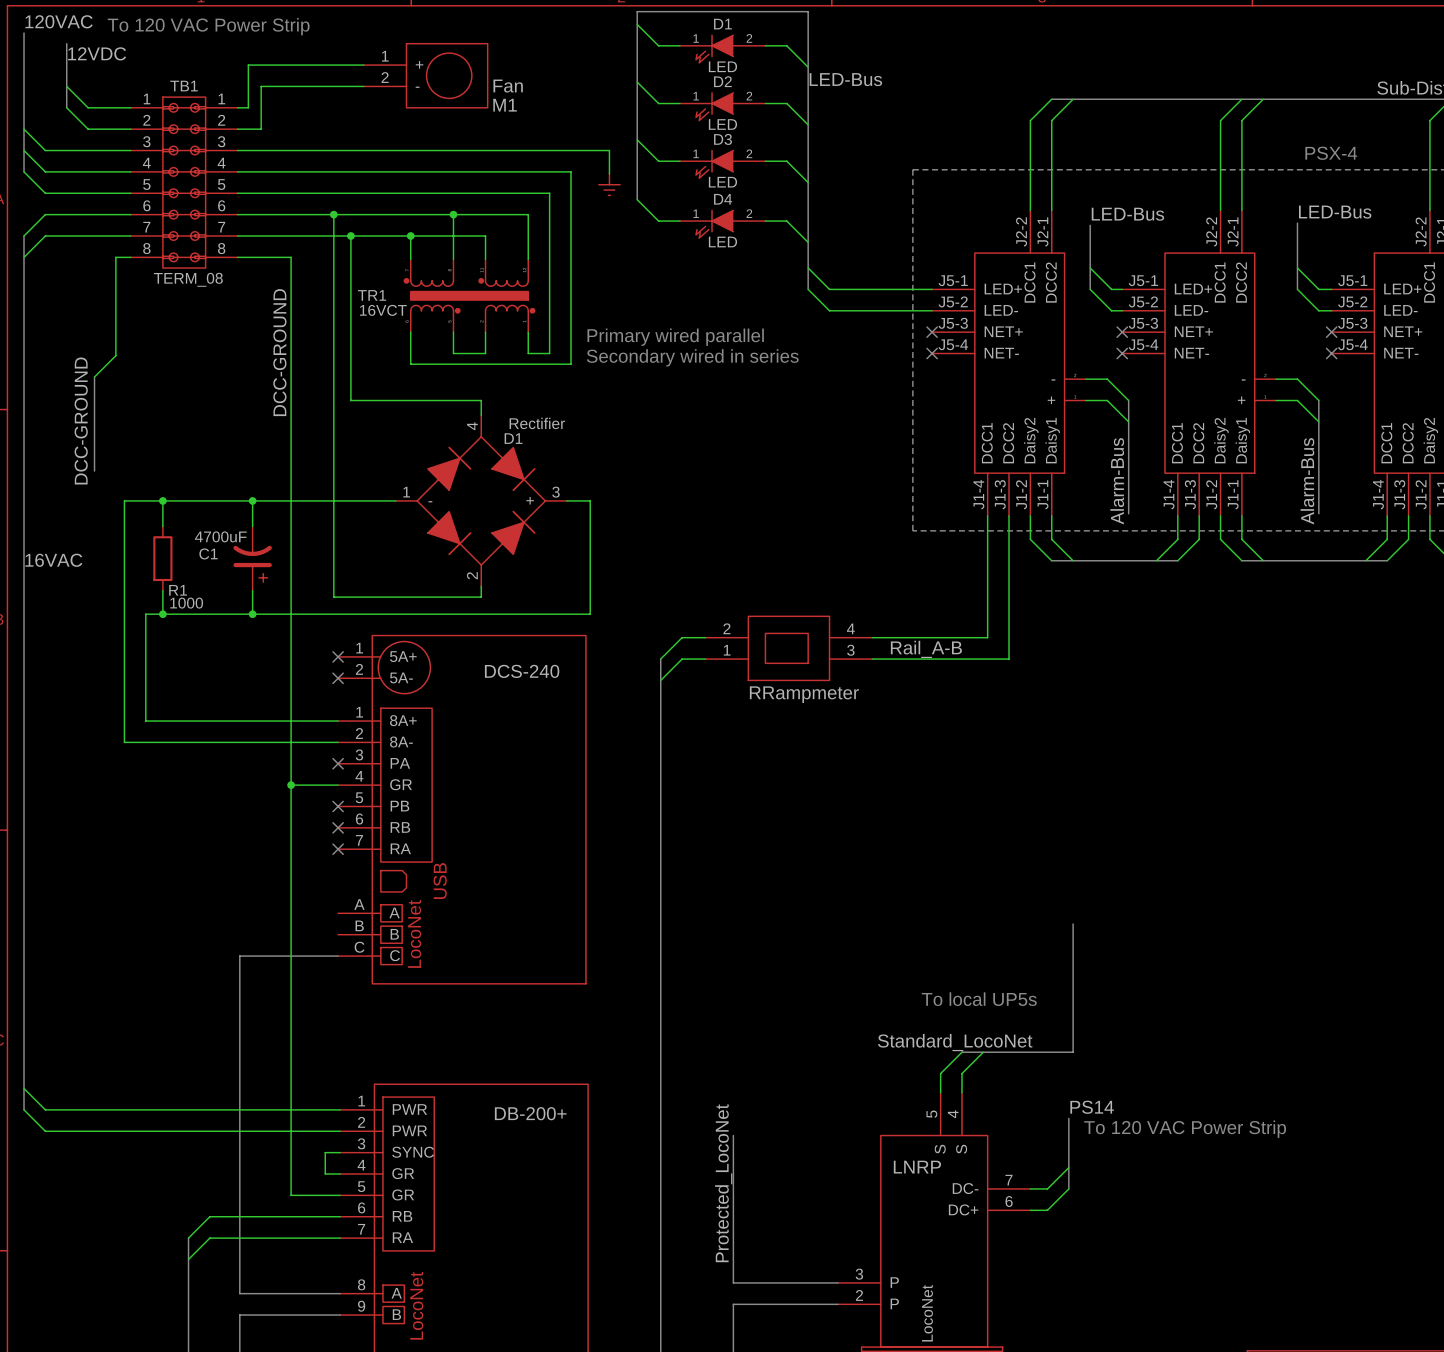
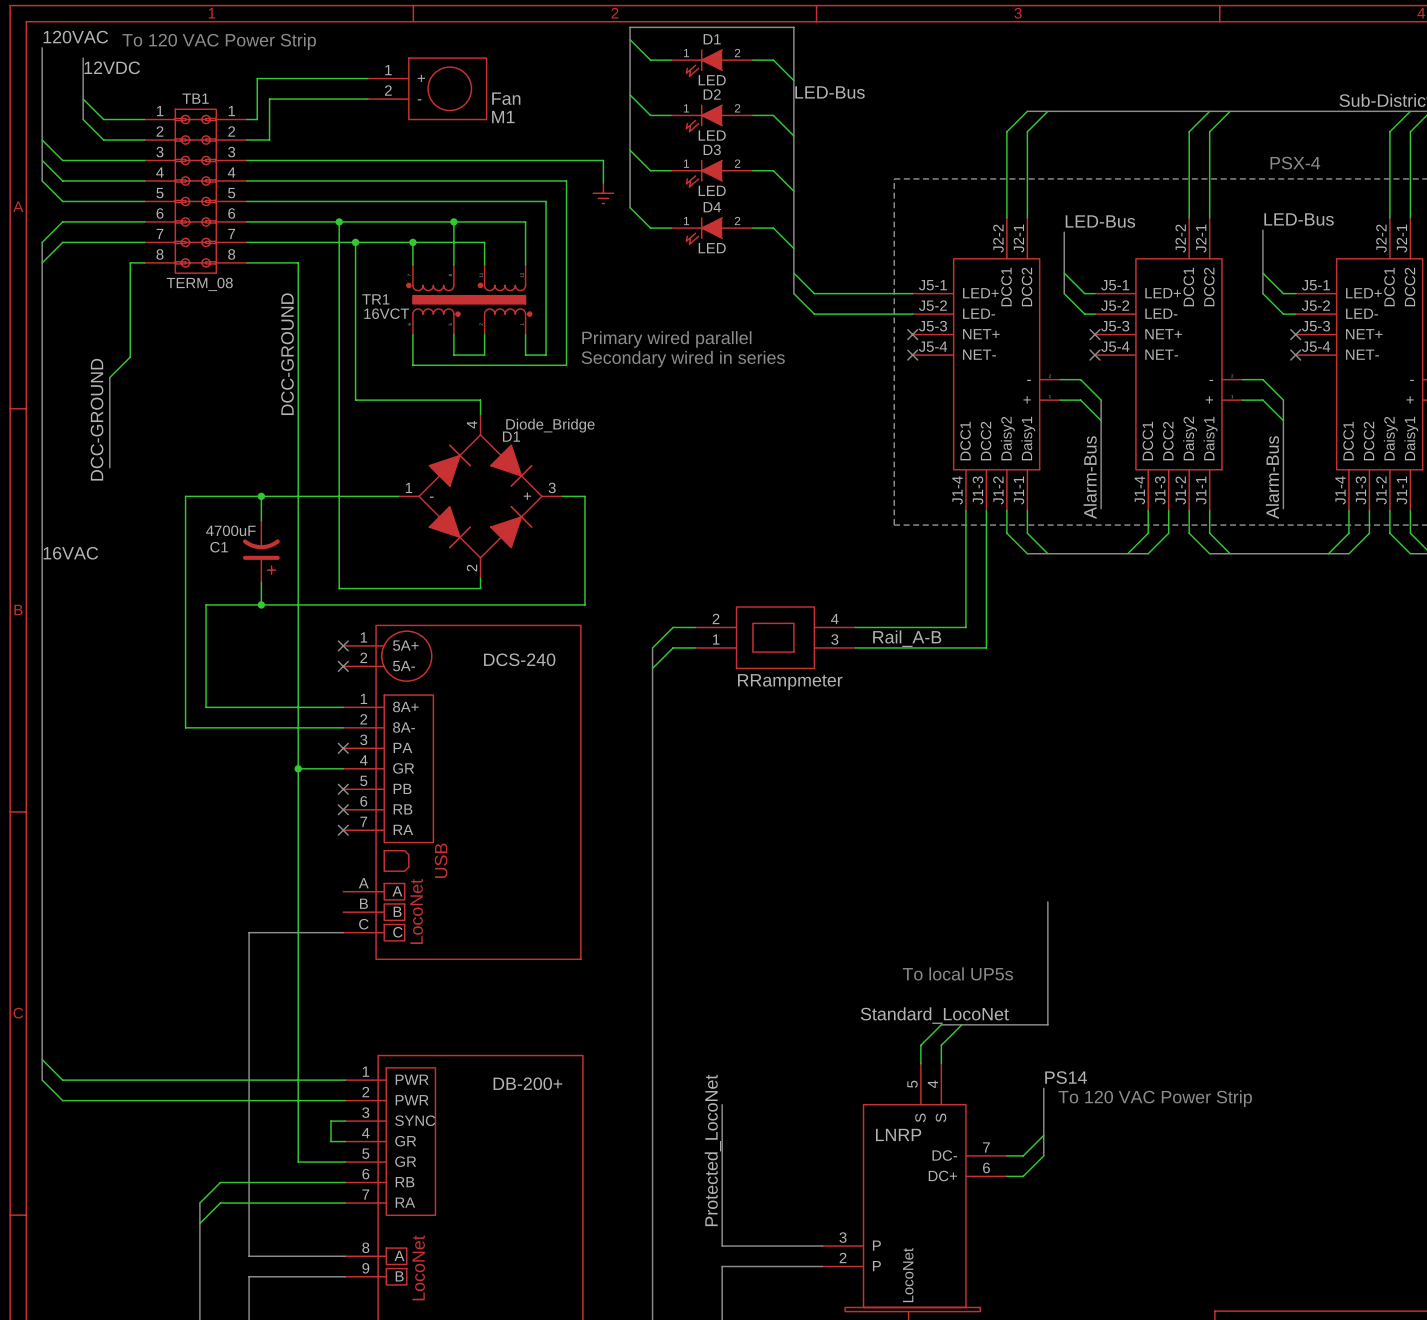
D1 value: Rectifier (537, 423) -> Diode_Bridge (550, 425)
wire: (162, 500) (162, 526) -> none
junction: (162, 500) -> none
wire: (173, 500) (124, 500) (124, 742) (173, 742) -> (185, 496) (185, 727)
R1: 1000 (162, 558) -> none
wire: (162, 590) (162, 614) -> none
junction: (162, 614) -> none
wire: (194, 614) (145, 614) (145, 721) (194, 721) -> (206, 604) (206, 707)

